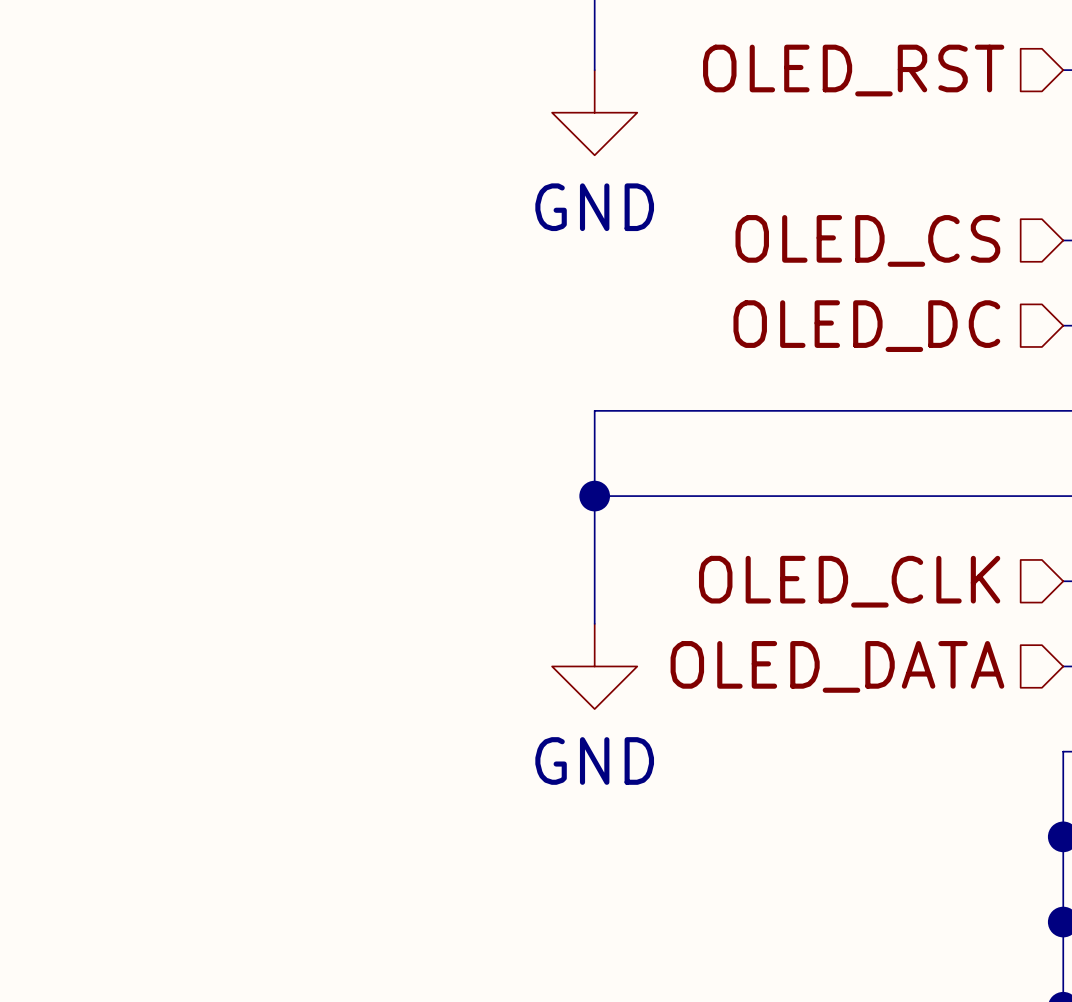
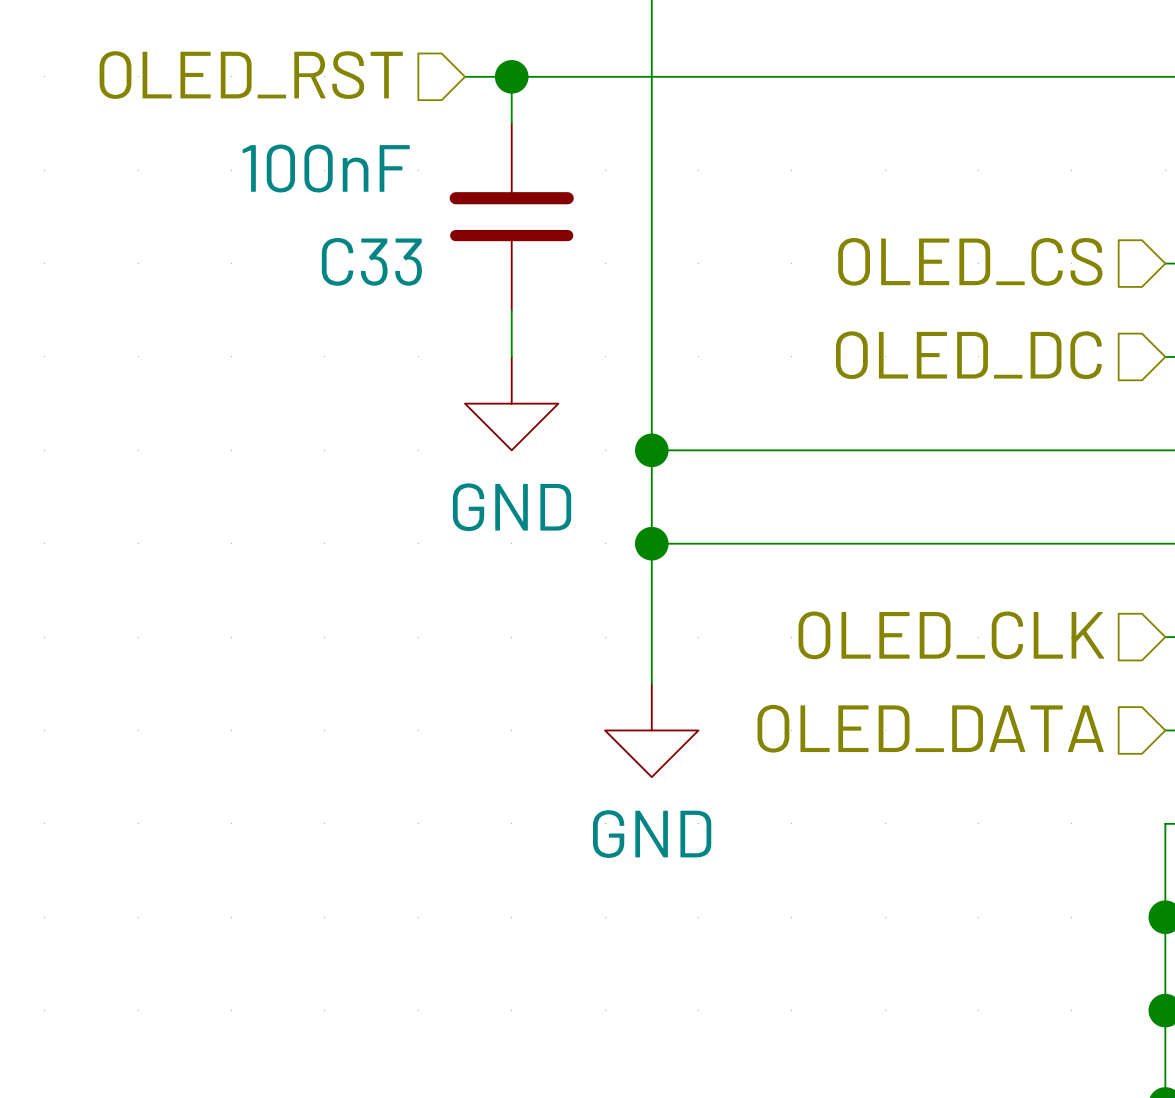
wire: none -> (465, 76) (1165, 76)
wire: none -> (511, 76) (511, 123)
junction: none -> (511, 76)
wire: none -> (651, 76) (651, 450)
hierarchical label position: OLED_RST (853, 70) -> OLED_RST (251, 75)
power symbol position: GND (594, 112) -> GND (511, 403)
C33: none -> 100nF (511, 216)
wire: none -> (511, 310) (511, 356)
junction: none -> (651, 450)

